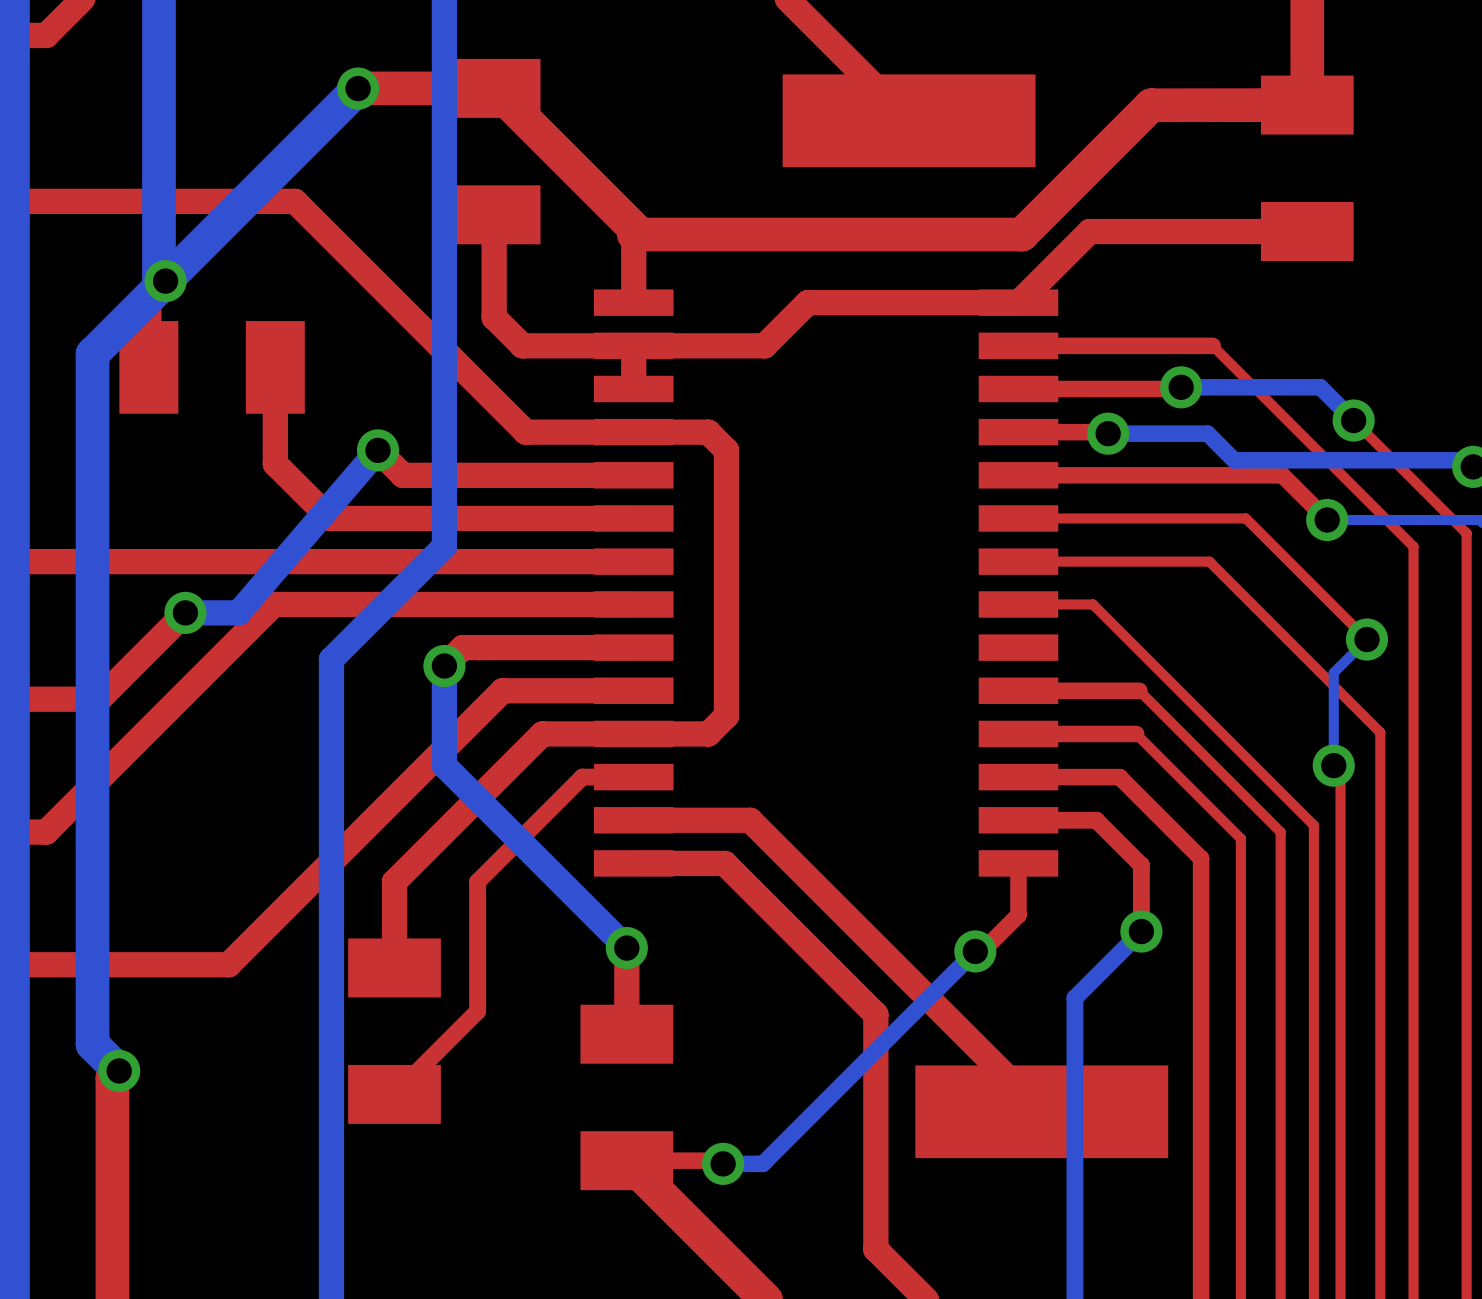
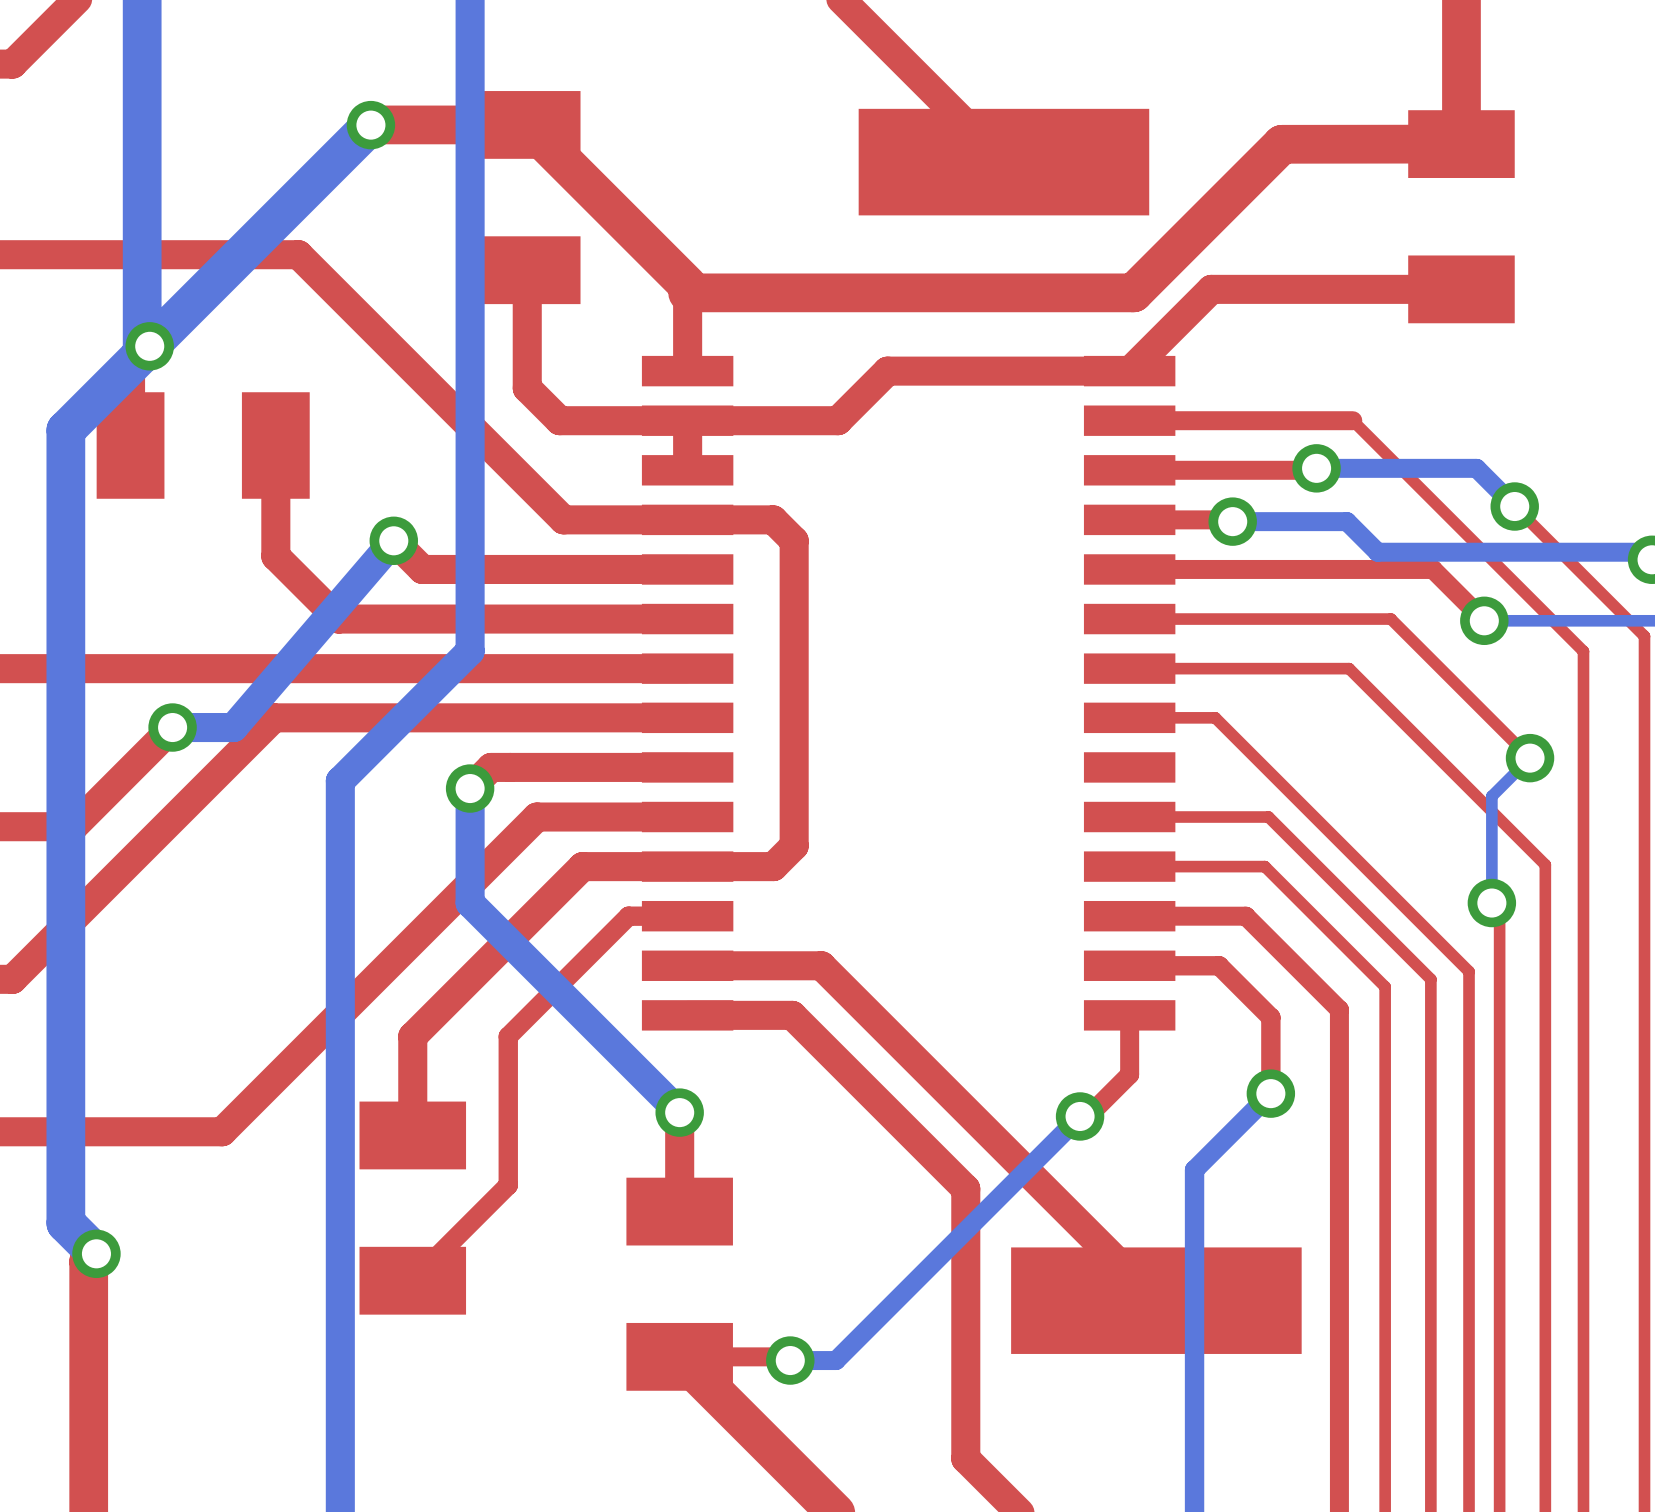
top track width: thick (1139, 690) (1018, 690) -> thin (1268, 817) (1129, 817)
top track width: thick (1136, 733) (1018, 733) -> thin (1264, 866) (1129, 866)

